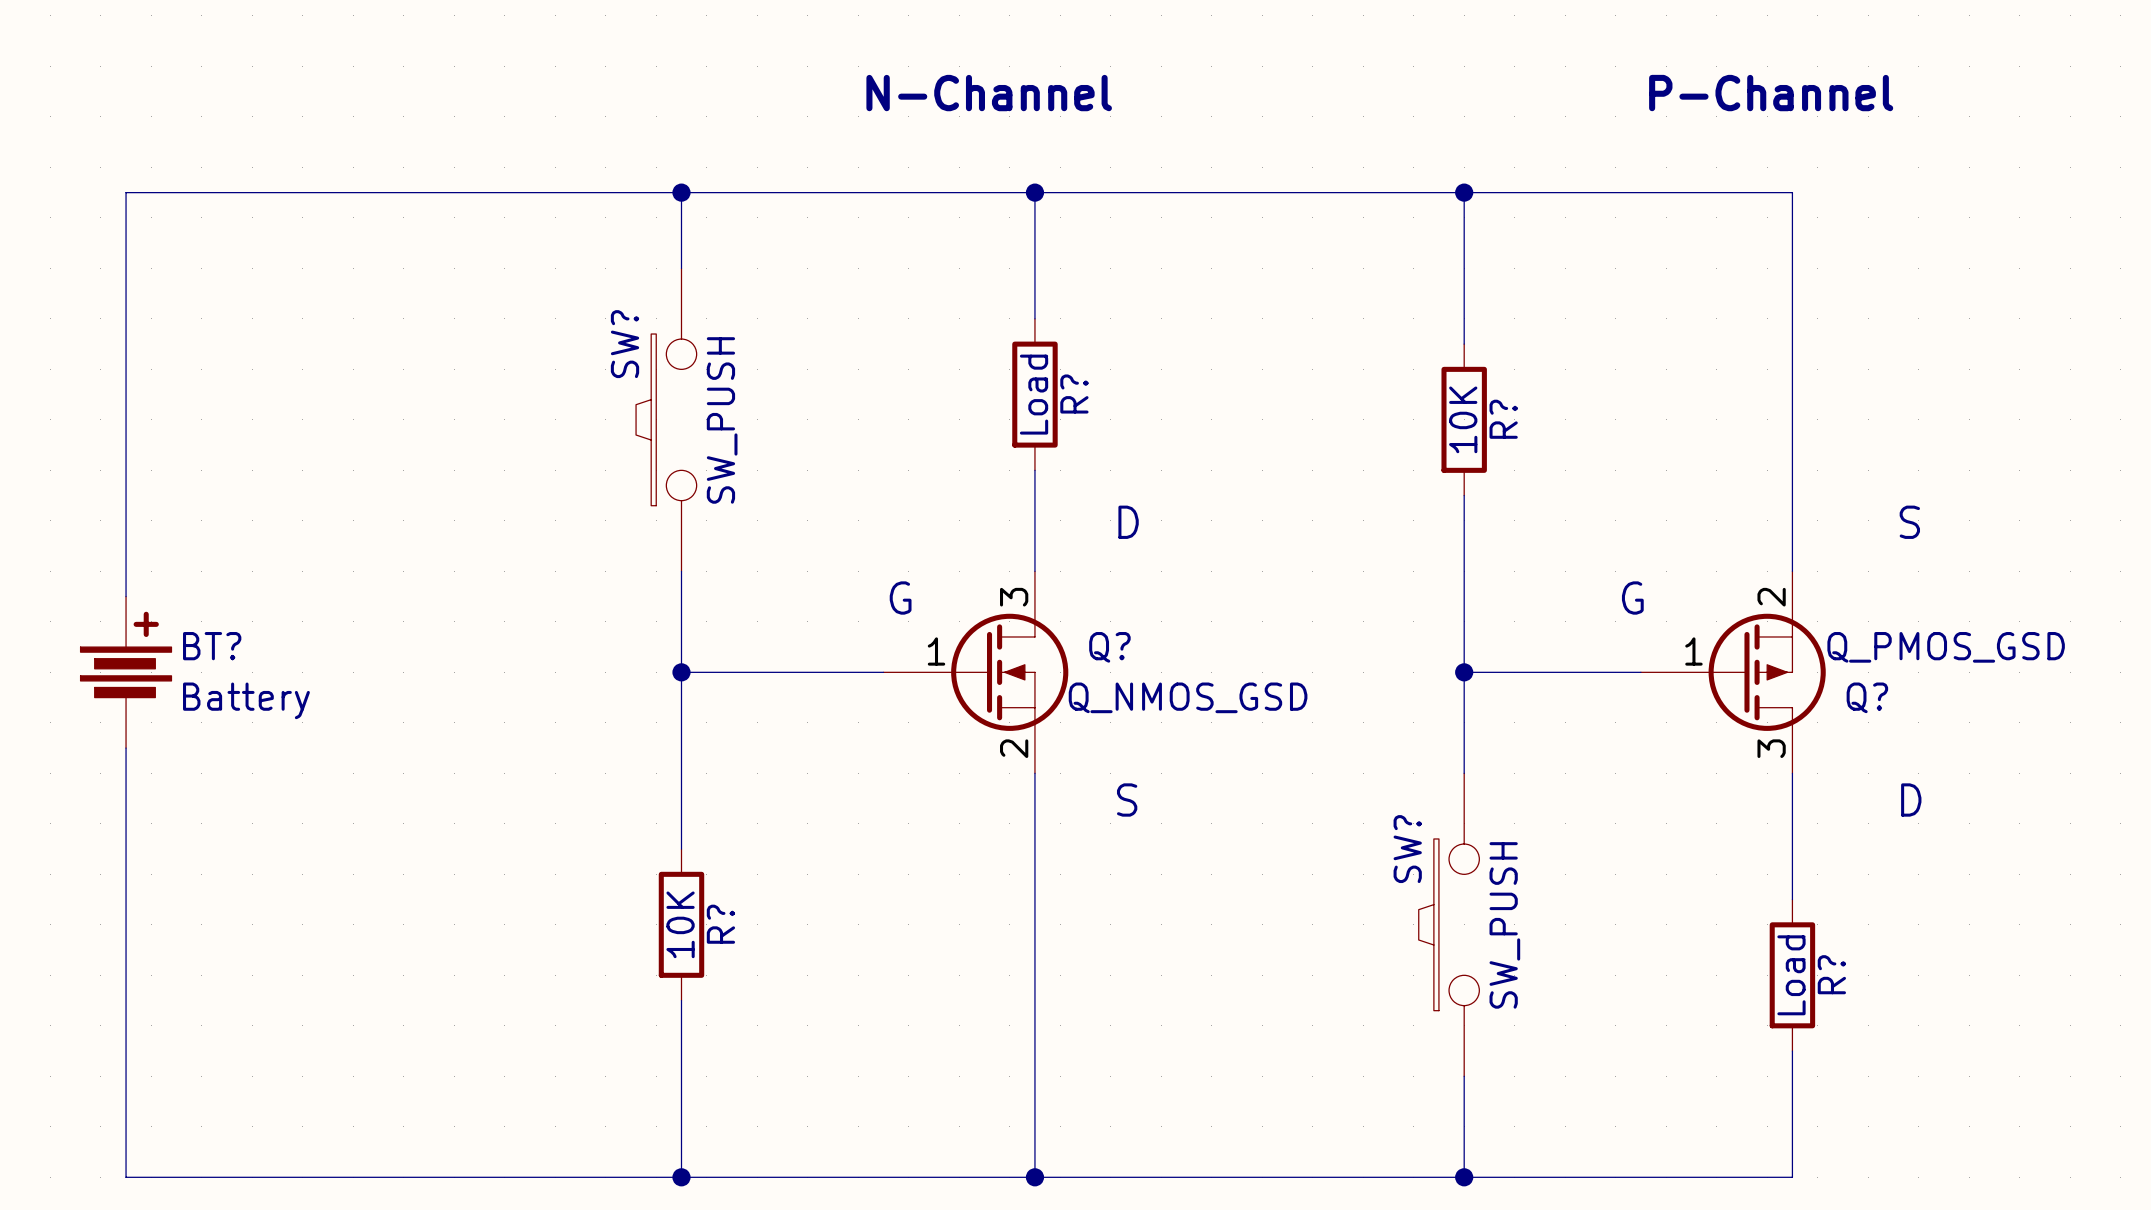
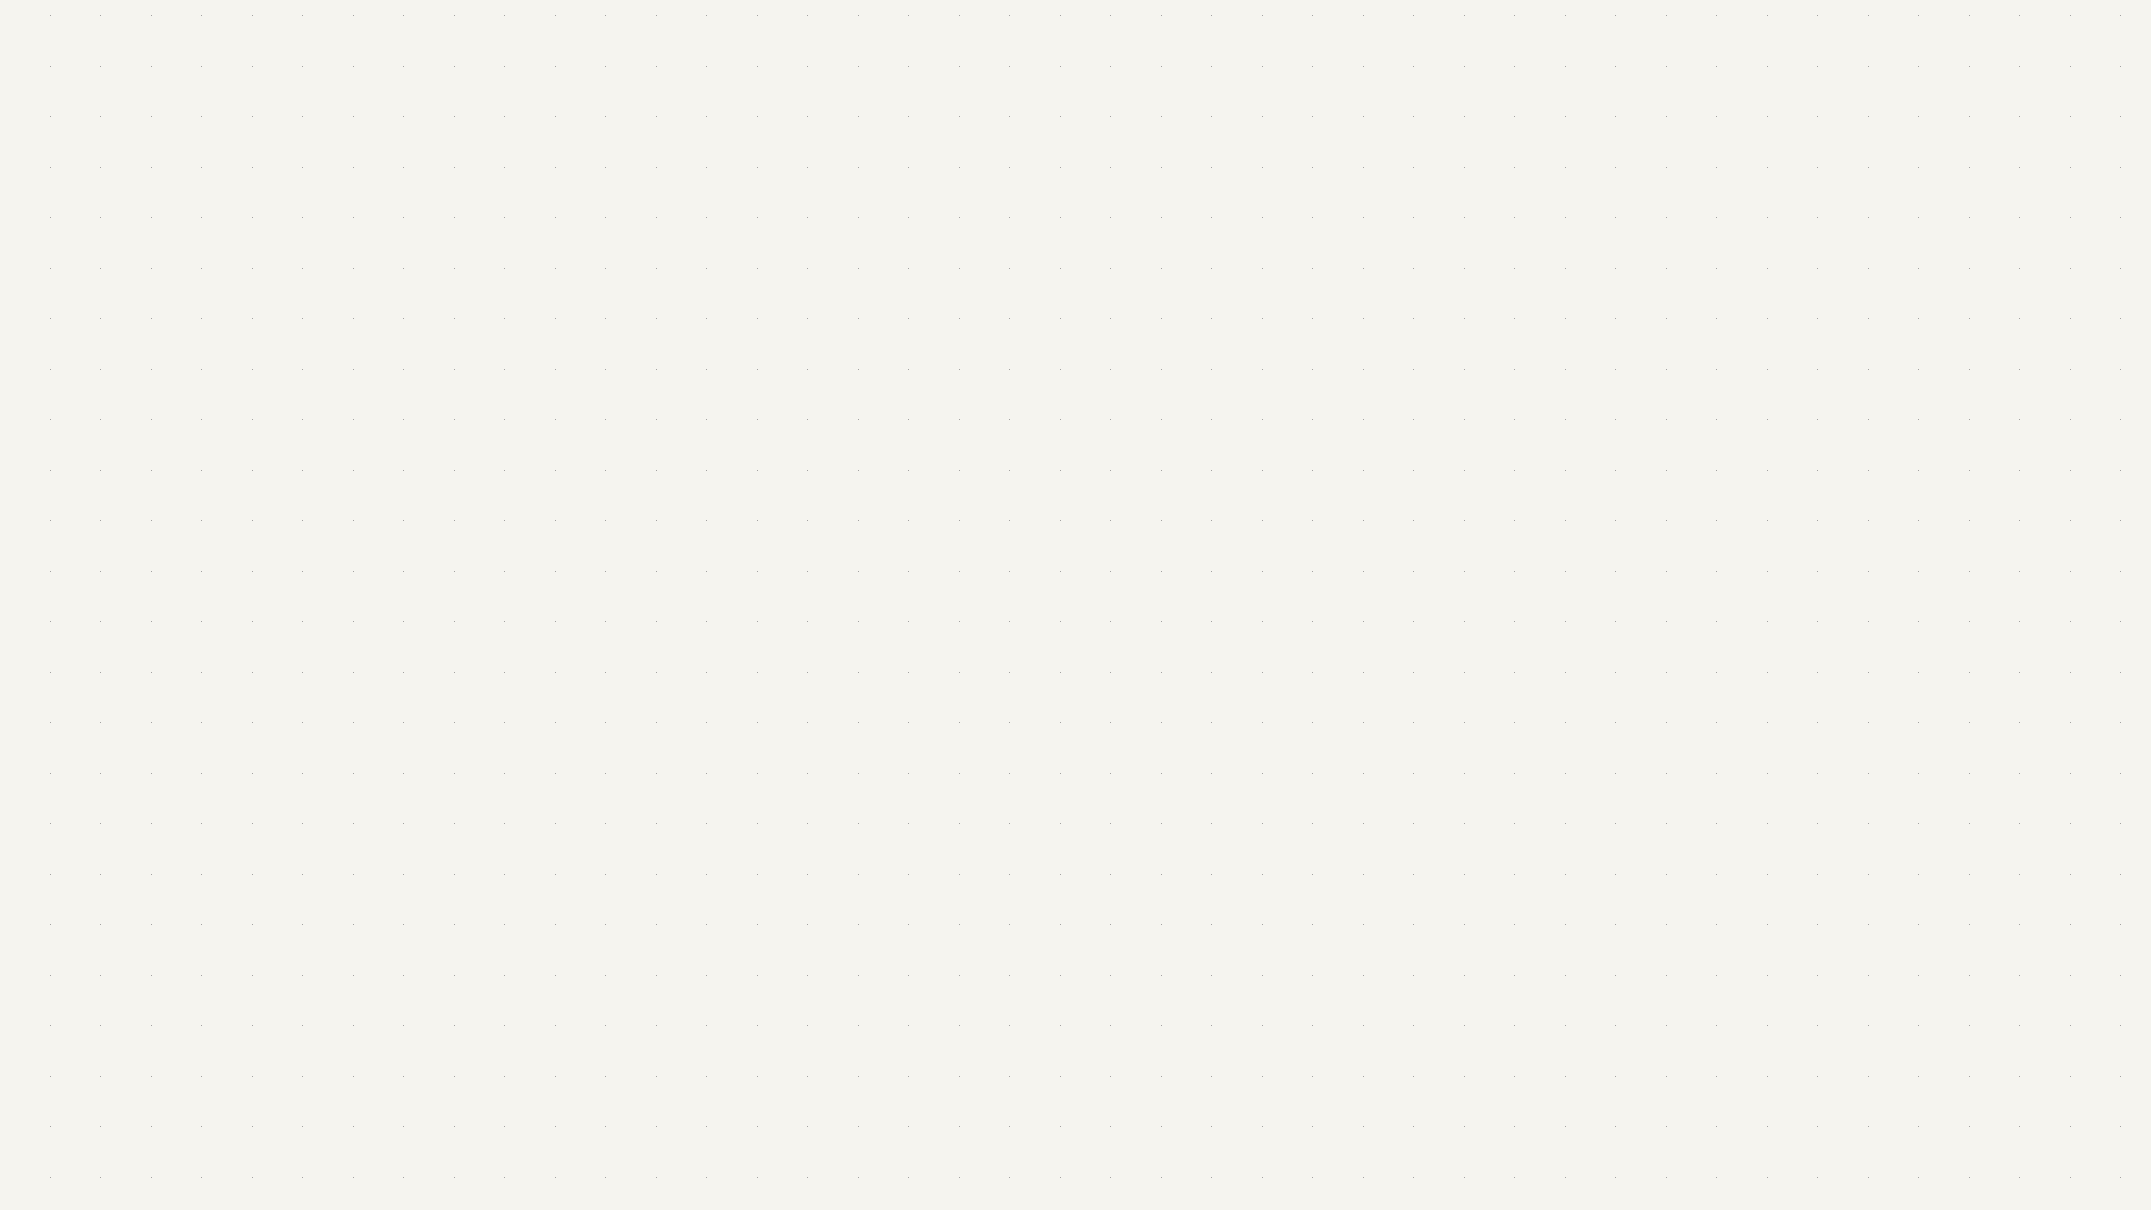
text: N-Channel (989, 93) -> none
text: P-Channel (1771, 93) -> none
wire: (681, 192) (681, 268) -> none
junction: (681, 192) -> none
wire: (1034, 192) (1034, 318) -> none
junction: (1034, 192) -> none
wire: (1464, 192) (1464, 344) -> none
junction: (1464, 192) -> none
R?: Load (1034, 394) -> none
SW?: SW_PUSH (666, 419) -> none
R?: 10K (1464, 419) -> none
wire: (1034, 470) (1034, 571) -> none
wire: (1464, 495) (1464, 773) -> none
text: D (1128, 522) -> none
text: S (1909, 522) -> none
wire: (681, 571) (681, 849) -> none
wire: (1792, 571) (1792, 192) (126, 192) (126, 596) -> none
text: G (900, 598) -> none
text: G (1632, 598) -> none
BT?: Battery (126, 672) -> none
wire: (681, 672) (883, 672) -> none
junction: (681, 672) -> none
Q?: Q_NMOS_GSD (975, 672) -> none
wire: (1464, 672) (1640, 672) -> none
junction: (1464, 672) -> none
Q?: Q_PMOS_GSD (1733, 672) -> none
wire: (126, 748) (126, 1177) (1792, 1177) (1792, 1051) -> none
wire: (1034, 773) (1034, 1177) -> none
wire: (1792, 773) (1792, 899) -> none
text: S (1127, 800) -> none
text: D (1911, 800) -> none
R?: 10K (681, 924) -> none
SW?: SW_PUSH (1449, 924) -> none
R?: Load (1792, 975) -> none
wire: (681, 1000) (681, 1177) -> none
wire: (1464, 1076) (1464, 1177) -> none
junction: (681, 1177) -> none
junction: (1034, 1177) -> none
junction: (1464, 1177) -> none

